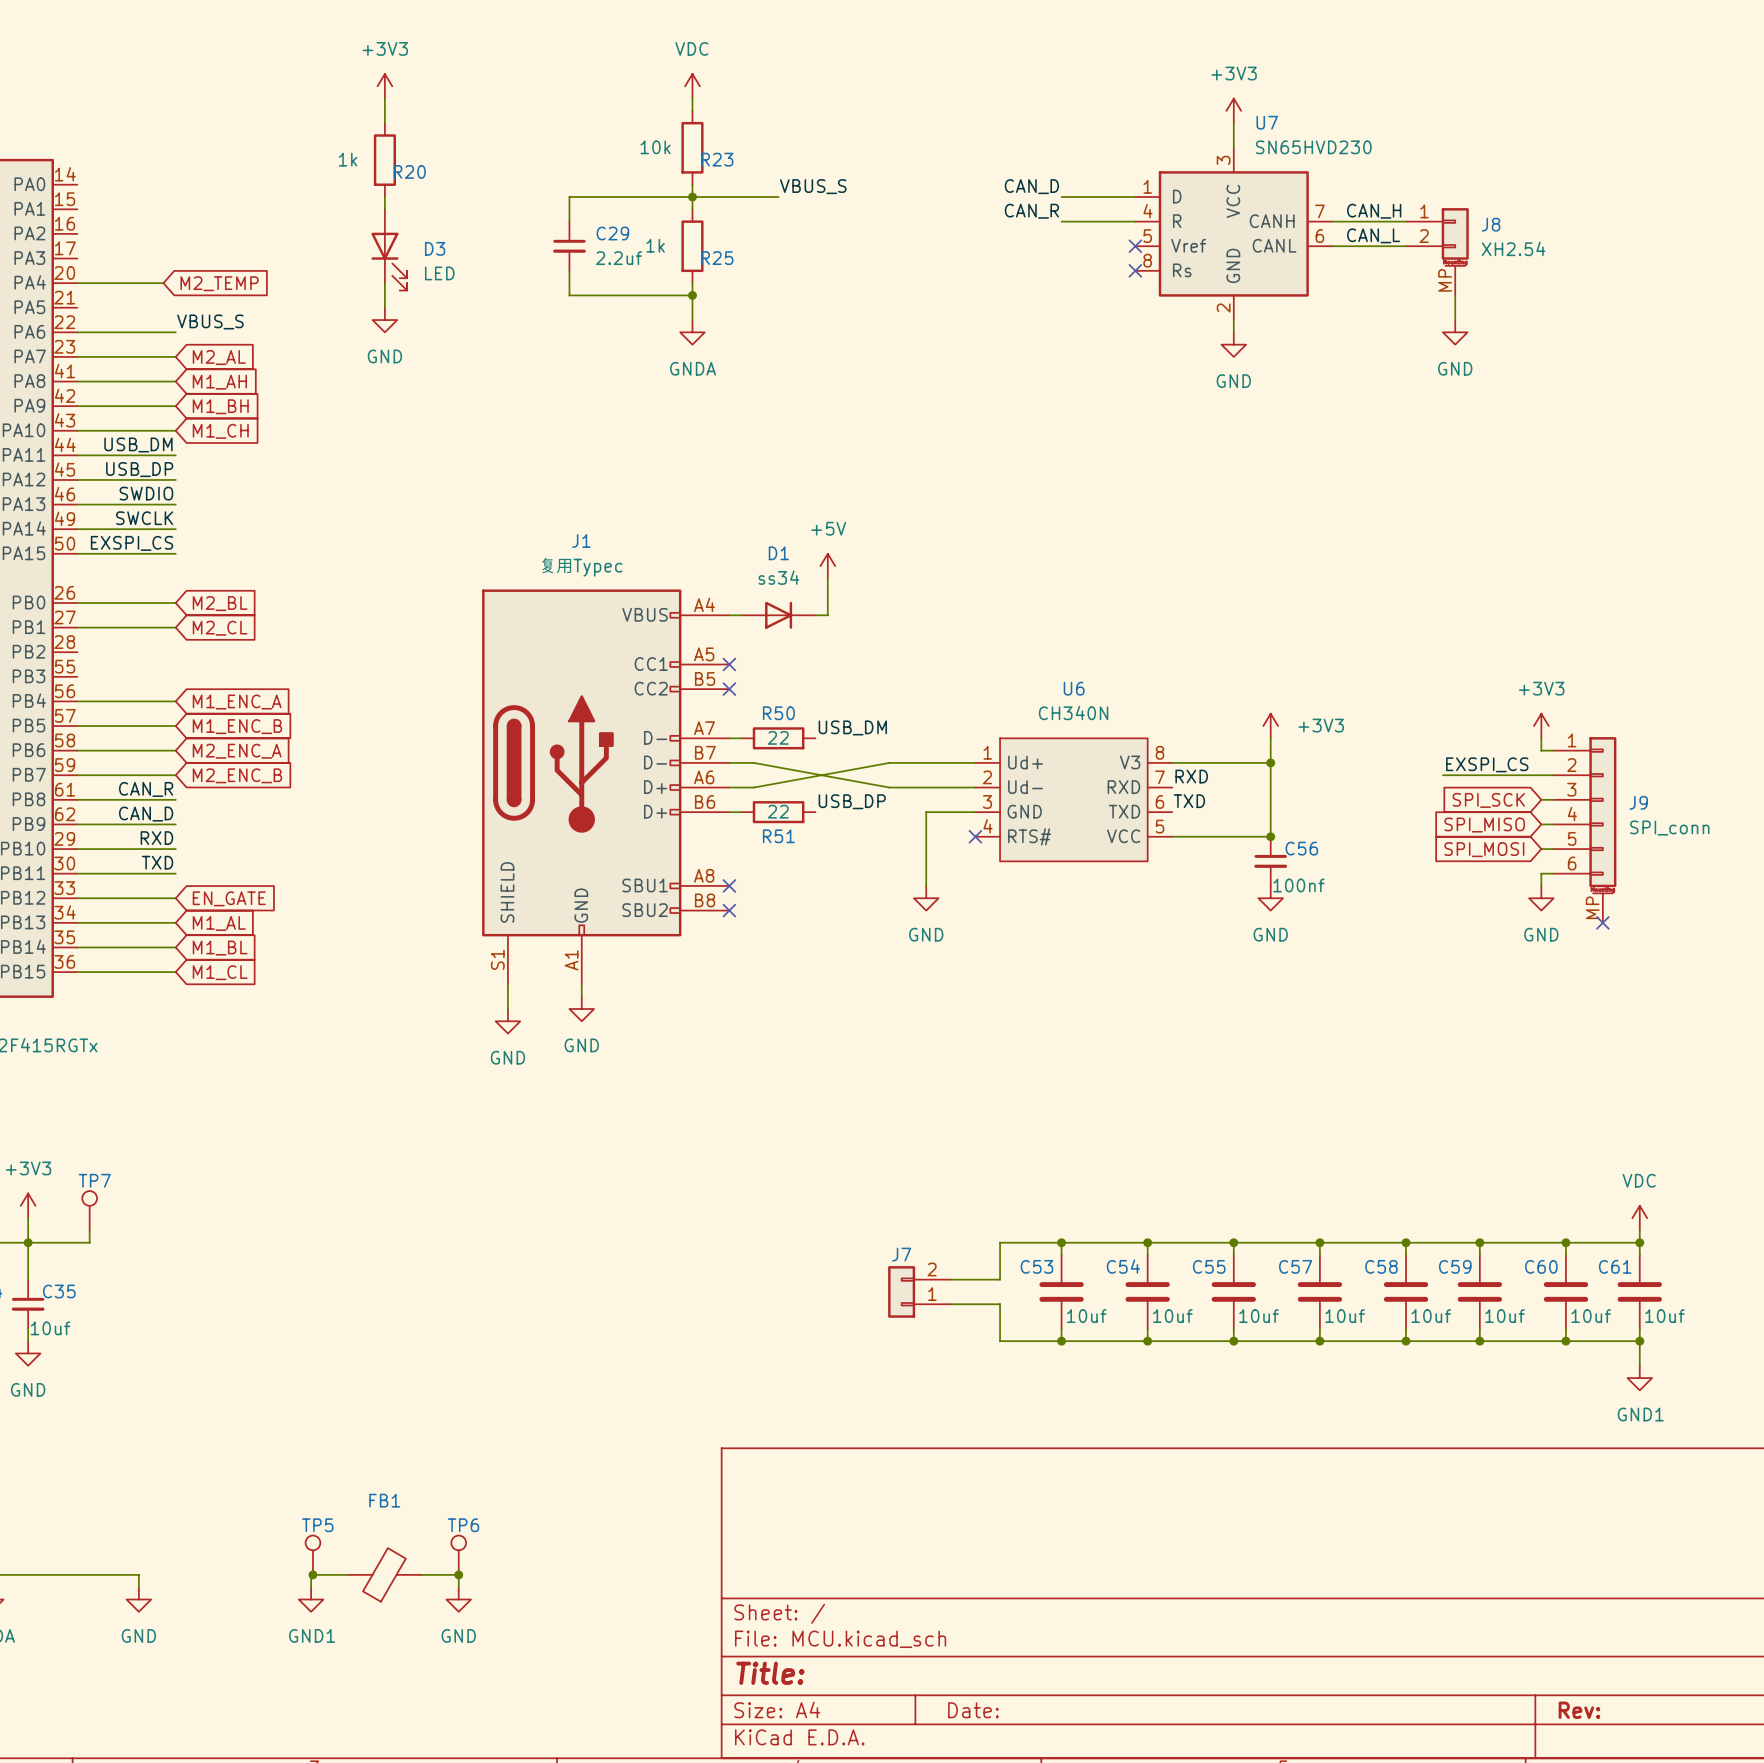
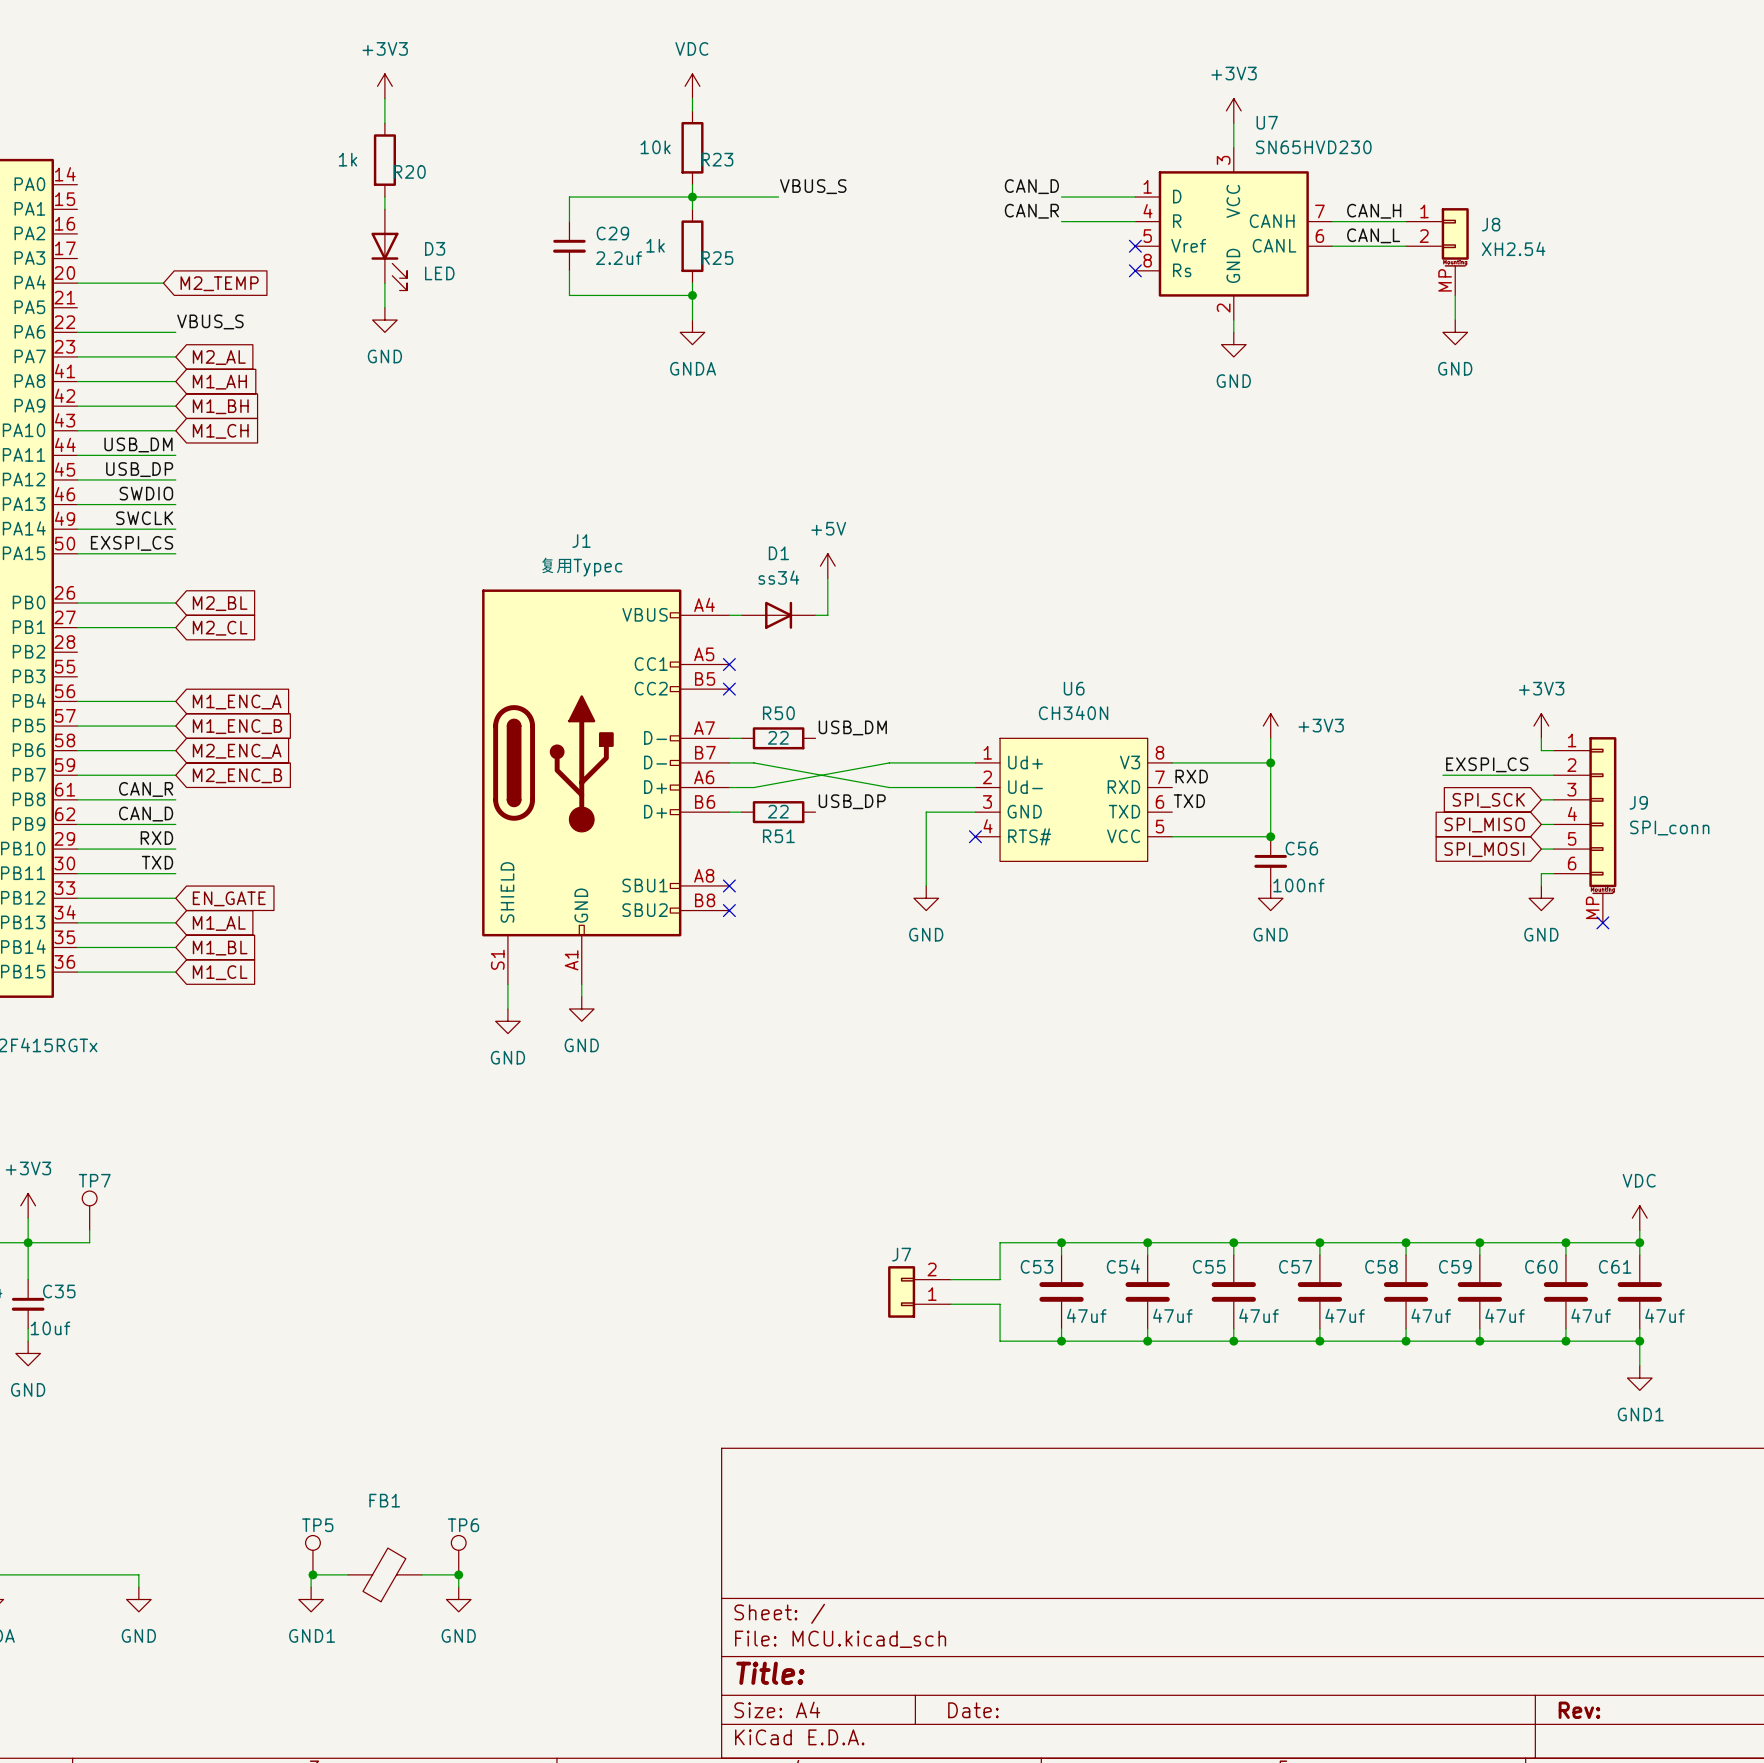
C53 value: 10uf (1086, 1316) -> 47uf (1086, 1315)
C54 value: 10uf (1172, 1316) -> 47uf (1172, 1315)
C55 value: 10uf (1258, 1316) -> 47uf (1258, 1315)
C57 value: 10uf (1345, 1316) -> 47uf (1345, 1315)
C58 value: 10uf (1431, 1316) -> 47uf (1431, 1315)
C59 value: 10uf (1505, 1316) -> 47uf (1505, 1315)
C60 value: 10uf (1591, 1316) -> 47uf (1591, 1315)
C61 value: 10uf (1664, 1316) -> 47uf (1664, 1315)

